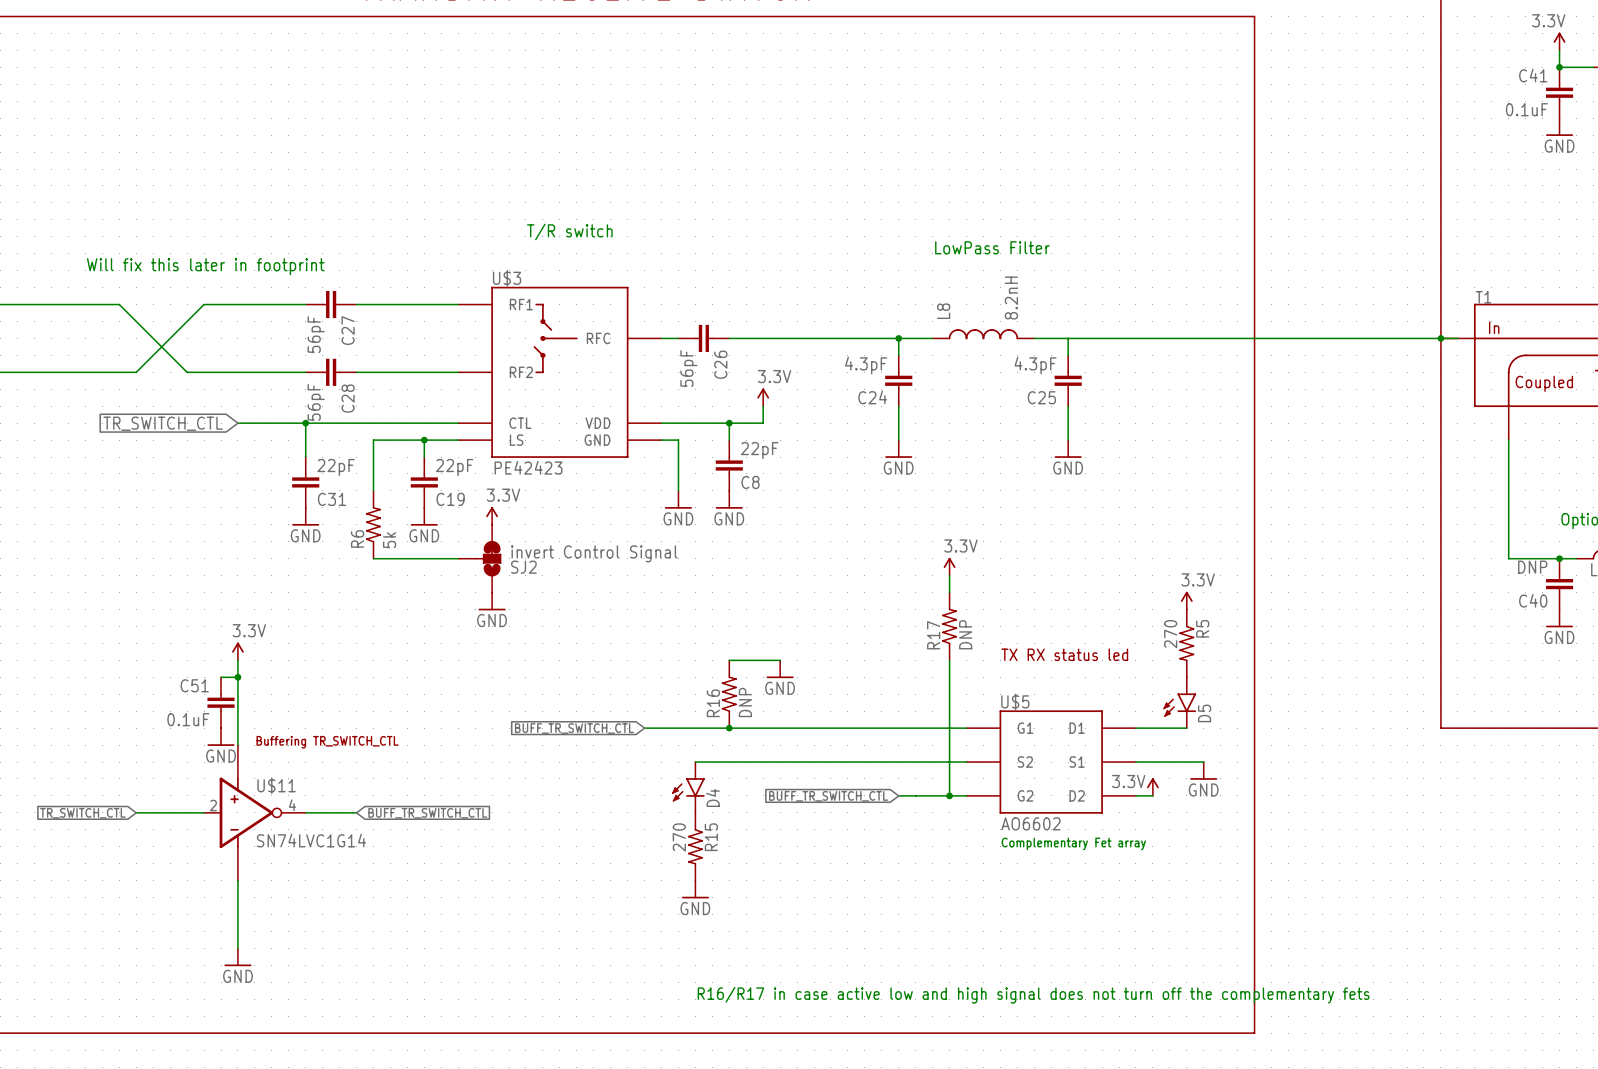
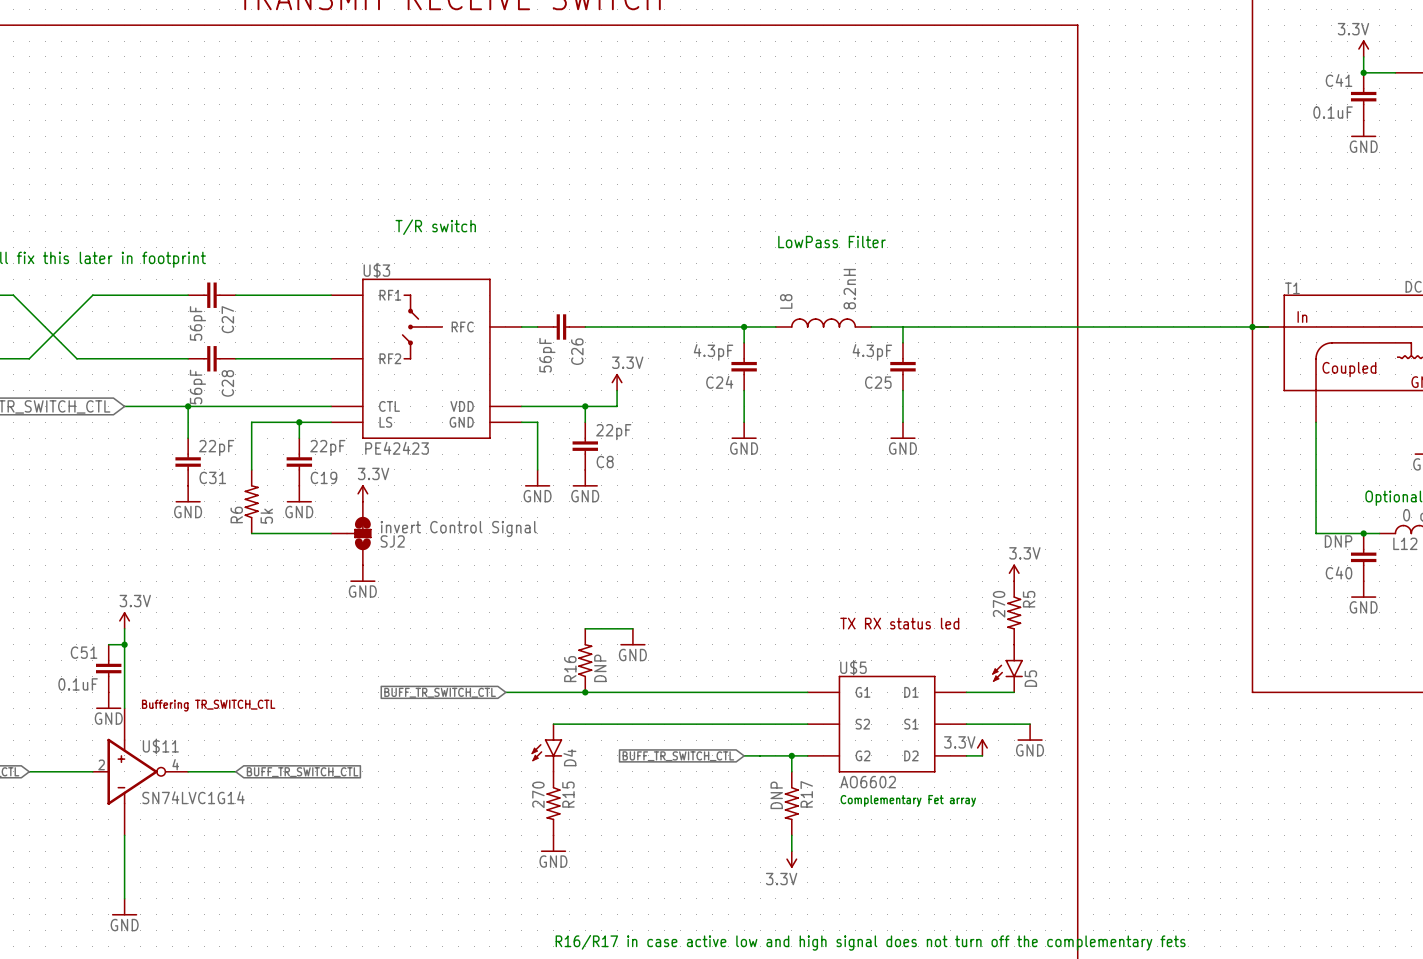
power symbol: 3.3V (949, 566) -> none
wire: (949, 575) (949, 592) -> none
R17 rotation: 0° (949, 626) -> 180° (791, 803)
R17 position: (949, 626) -> (791, 803)
wire: (949, 660) (949, 795) -> (791, 771) (791, 755)
wire: none -> (791, 835) (791, 851)
power symbol: none -> 3.3V (791, 859)

